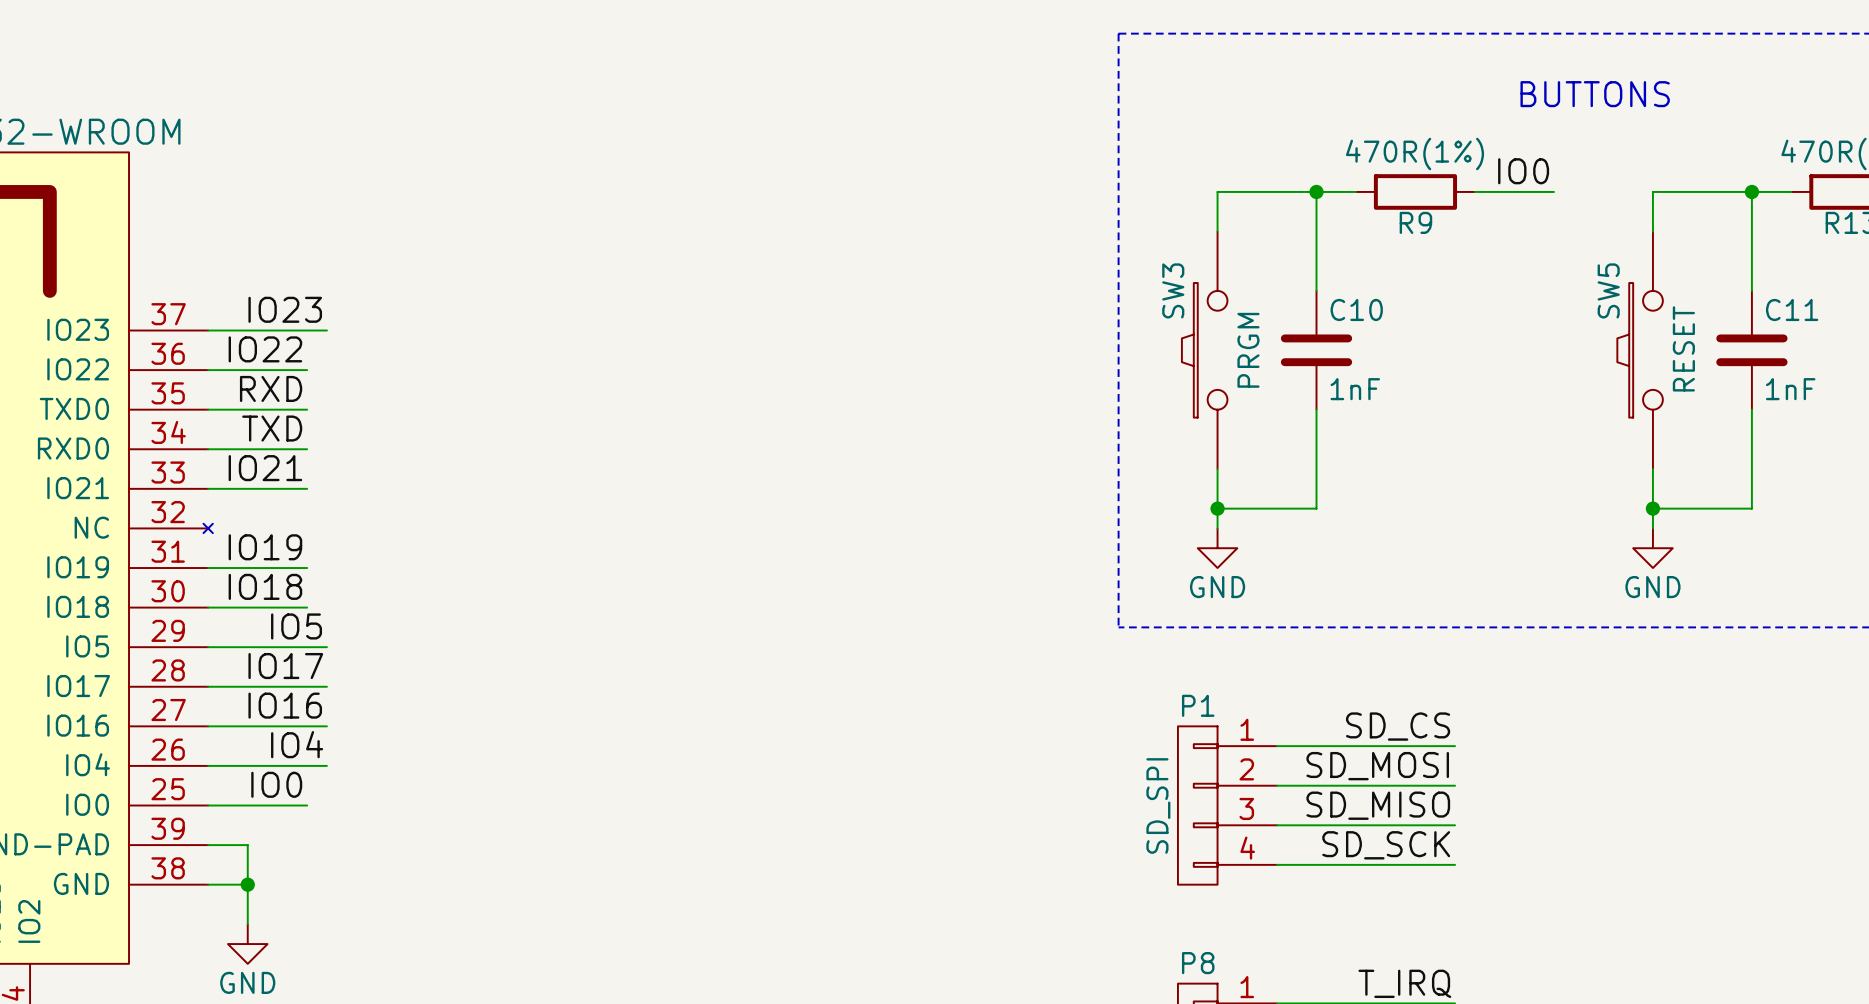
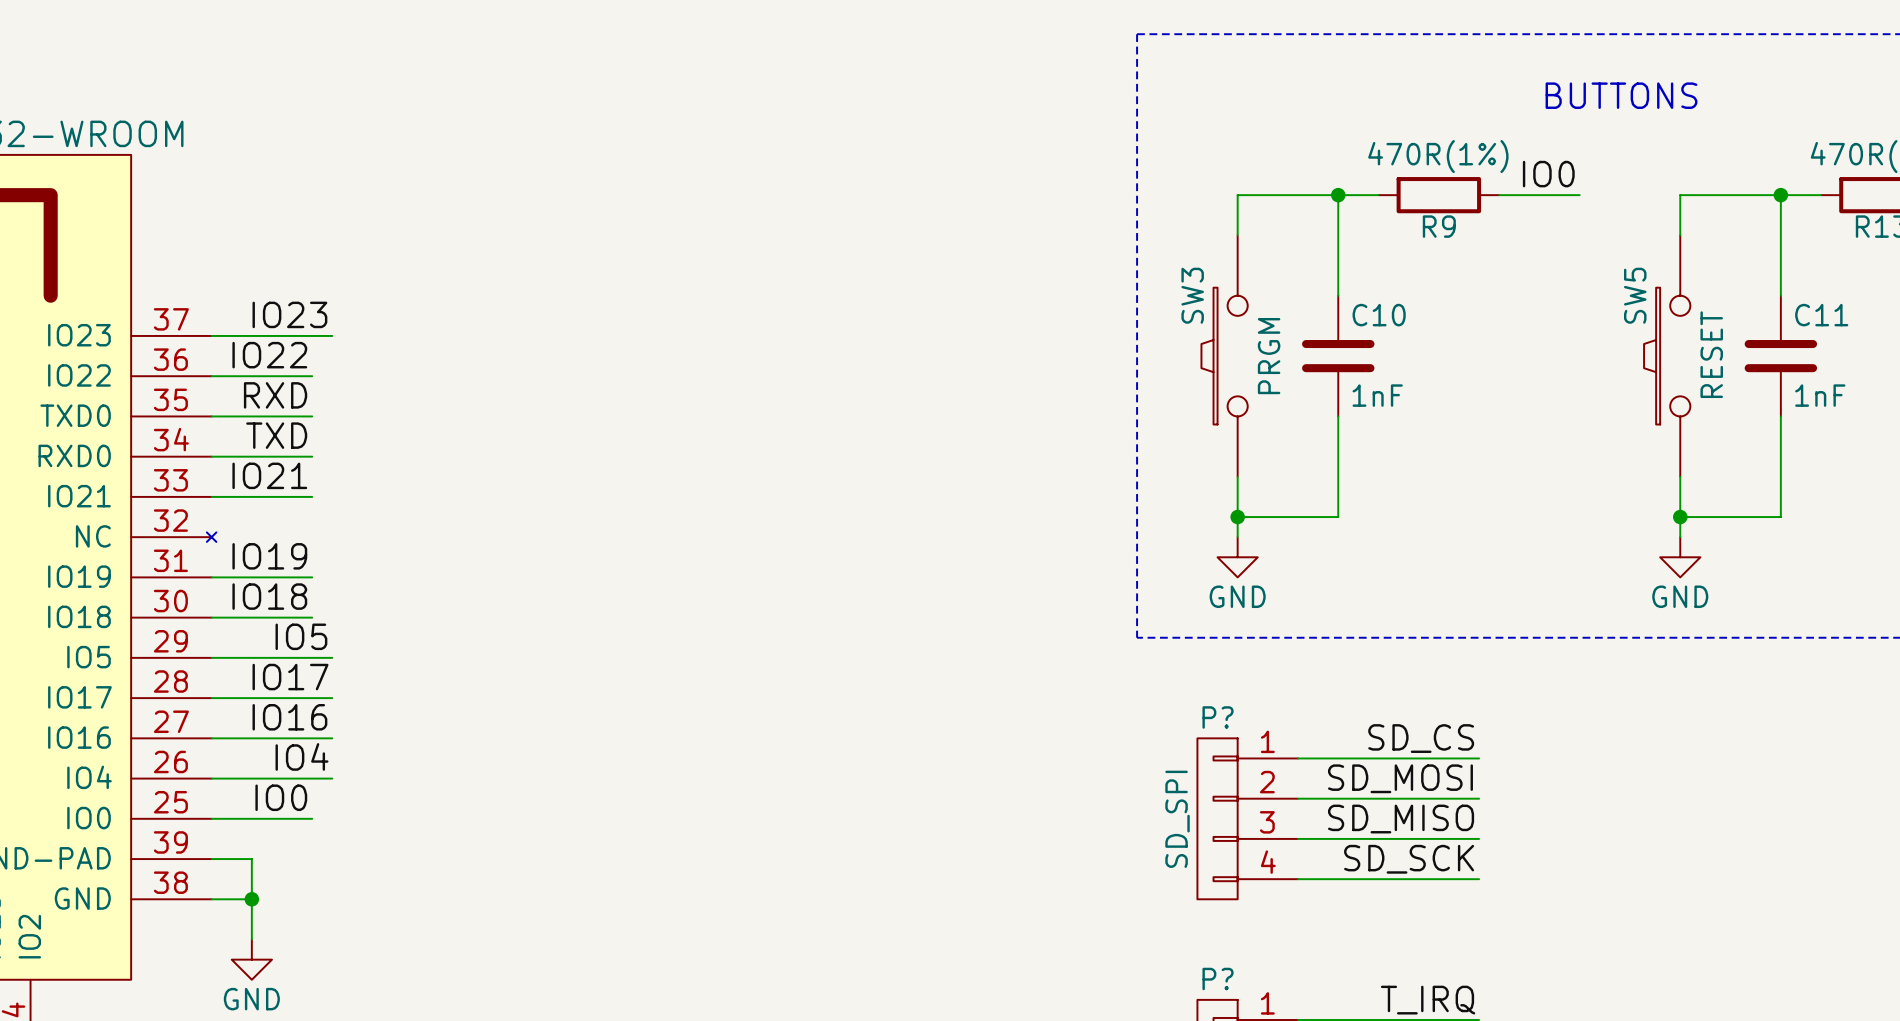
P1 name: P1 (1198, 705) -> P? (1218, 717)
P8 name: P8 (1198, 963) -> P? (1218, 979)

